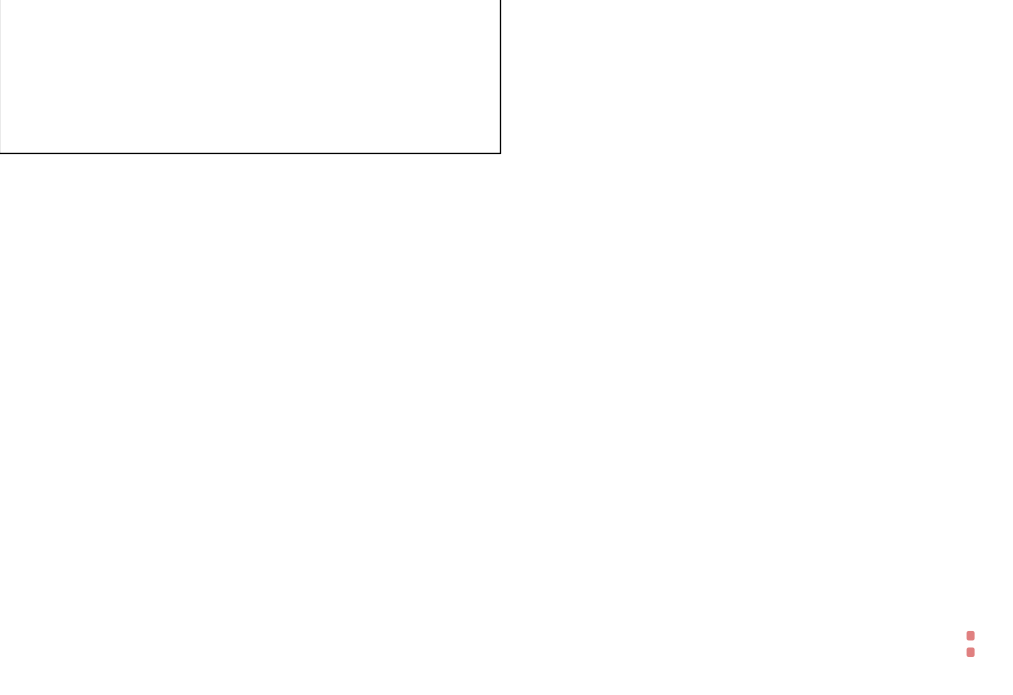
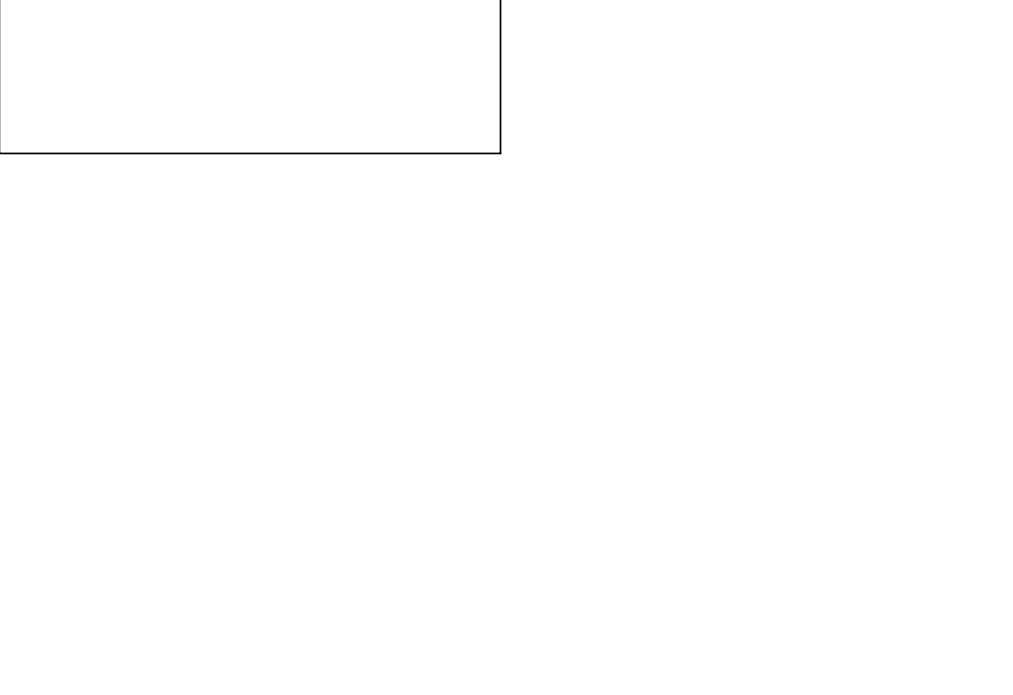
part: (970, 643) -> none

